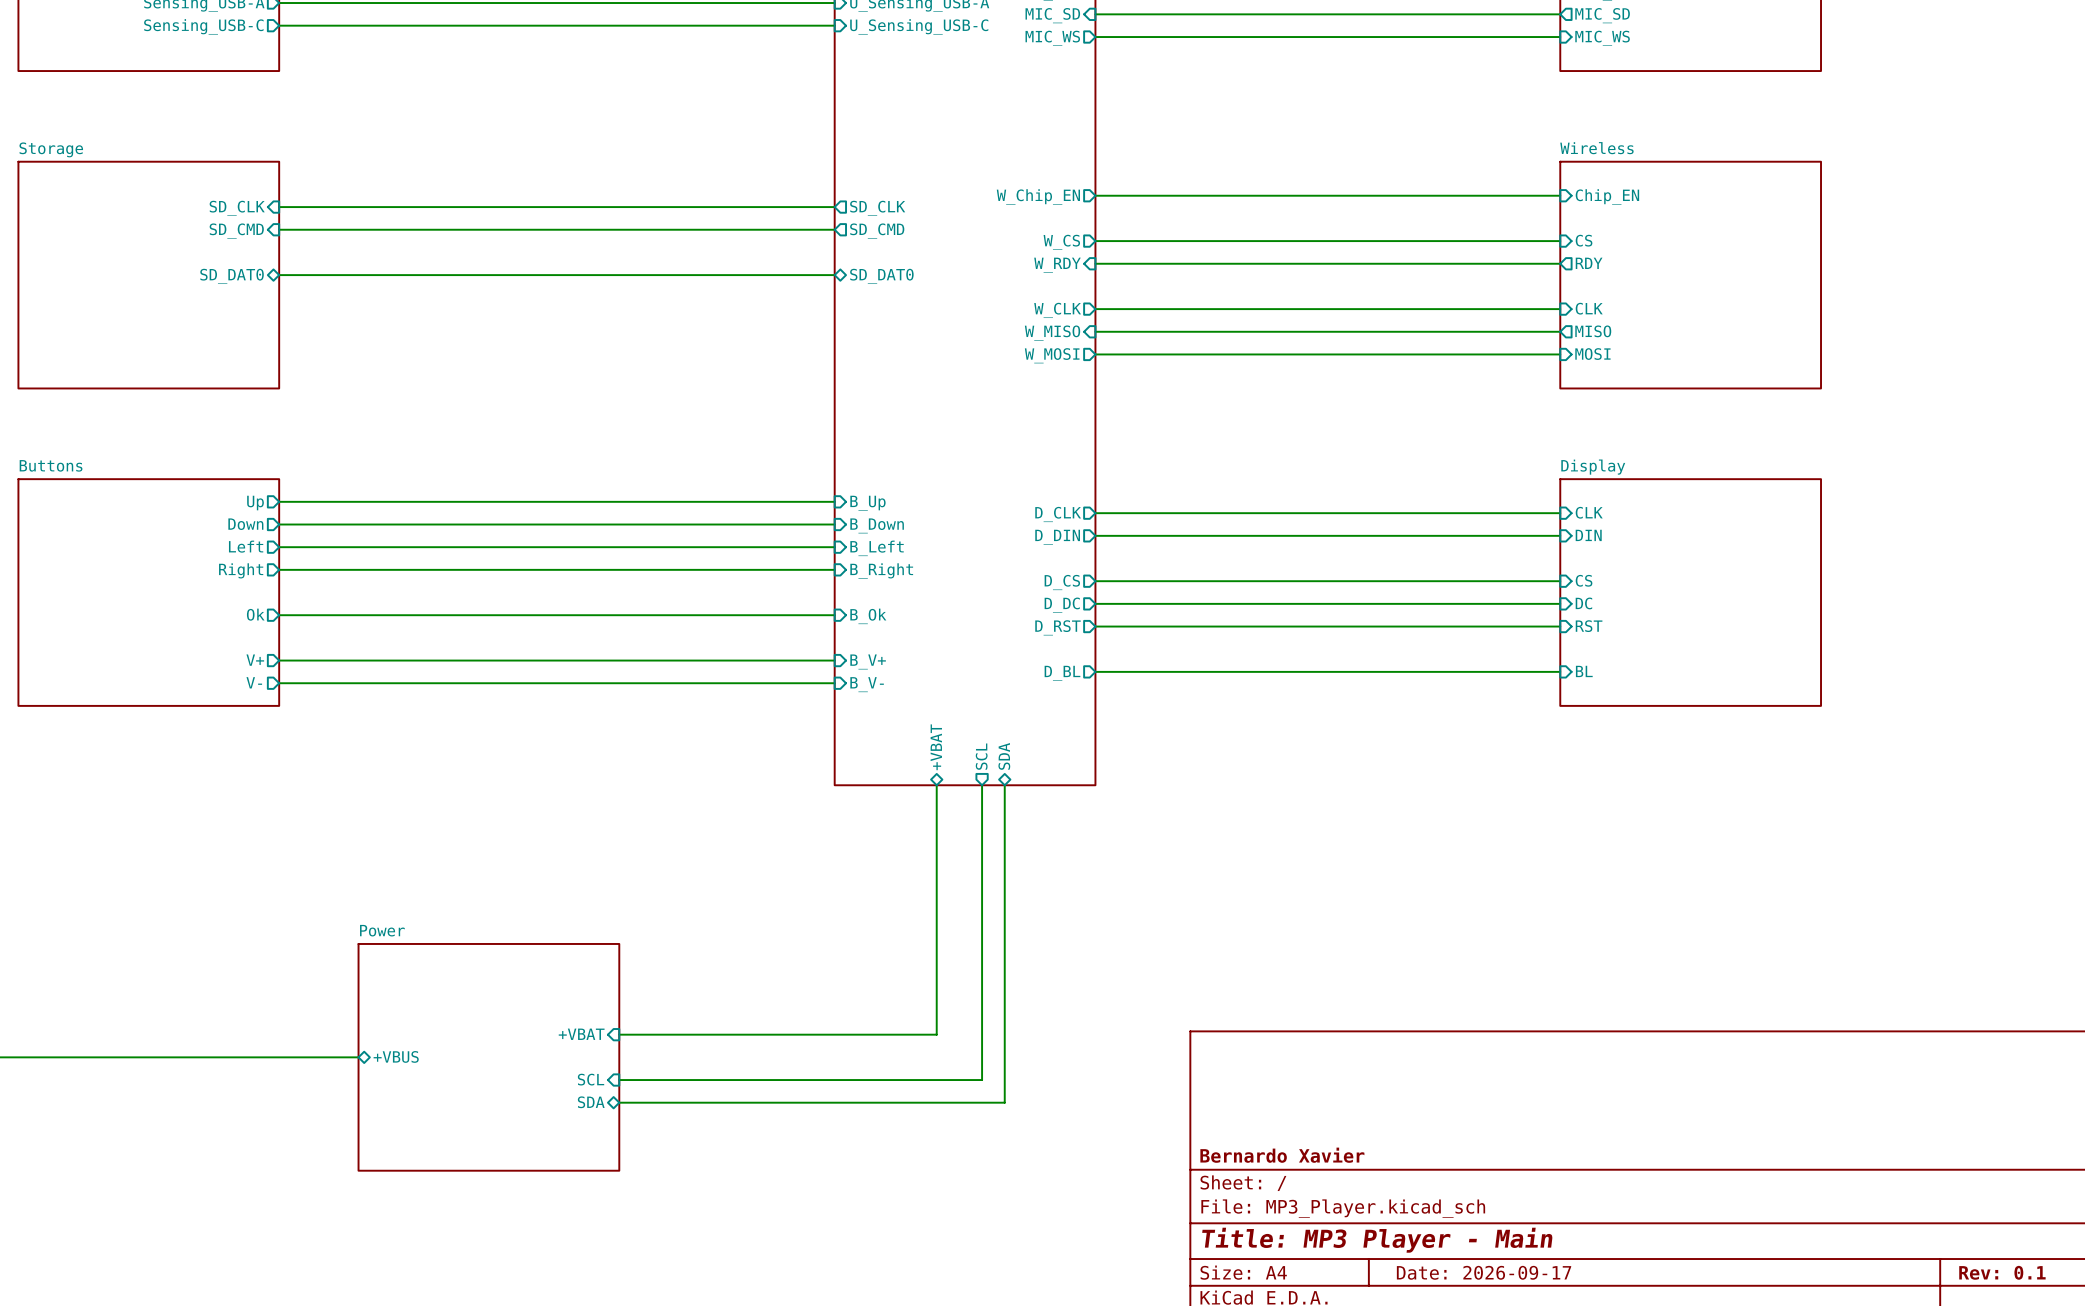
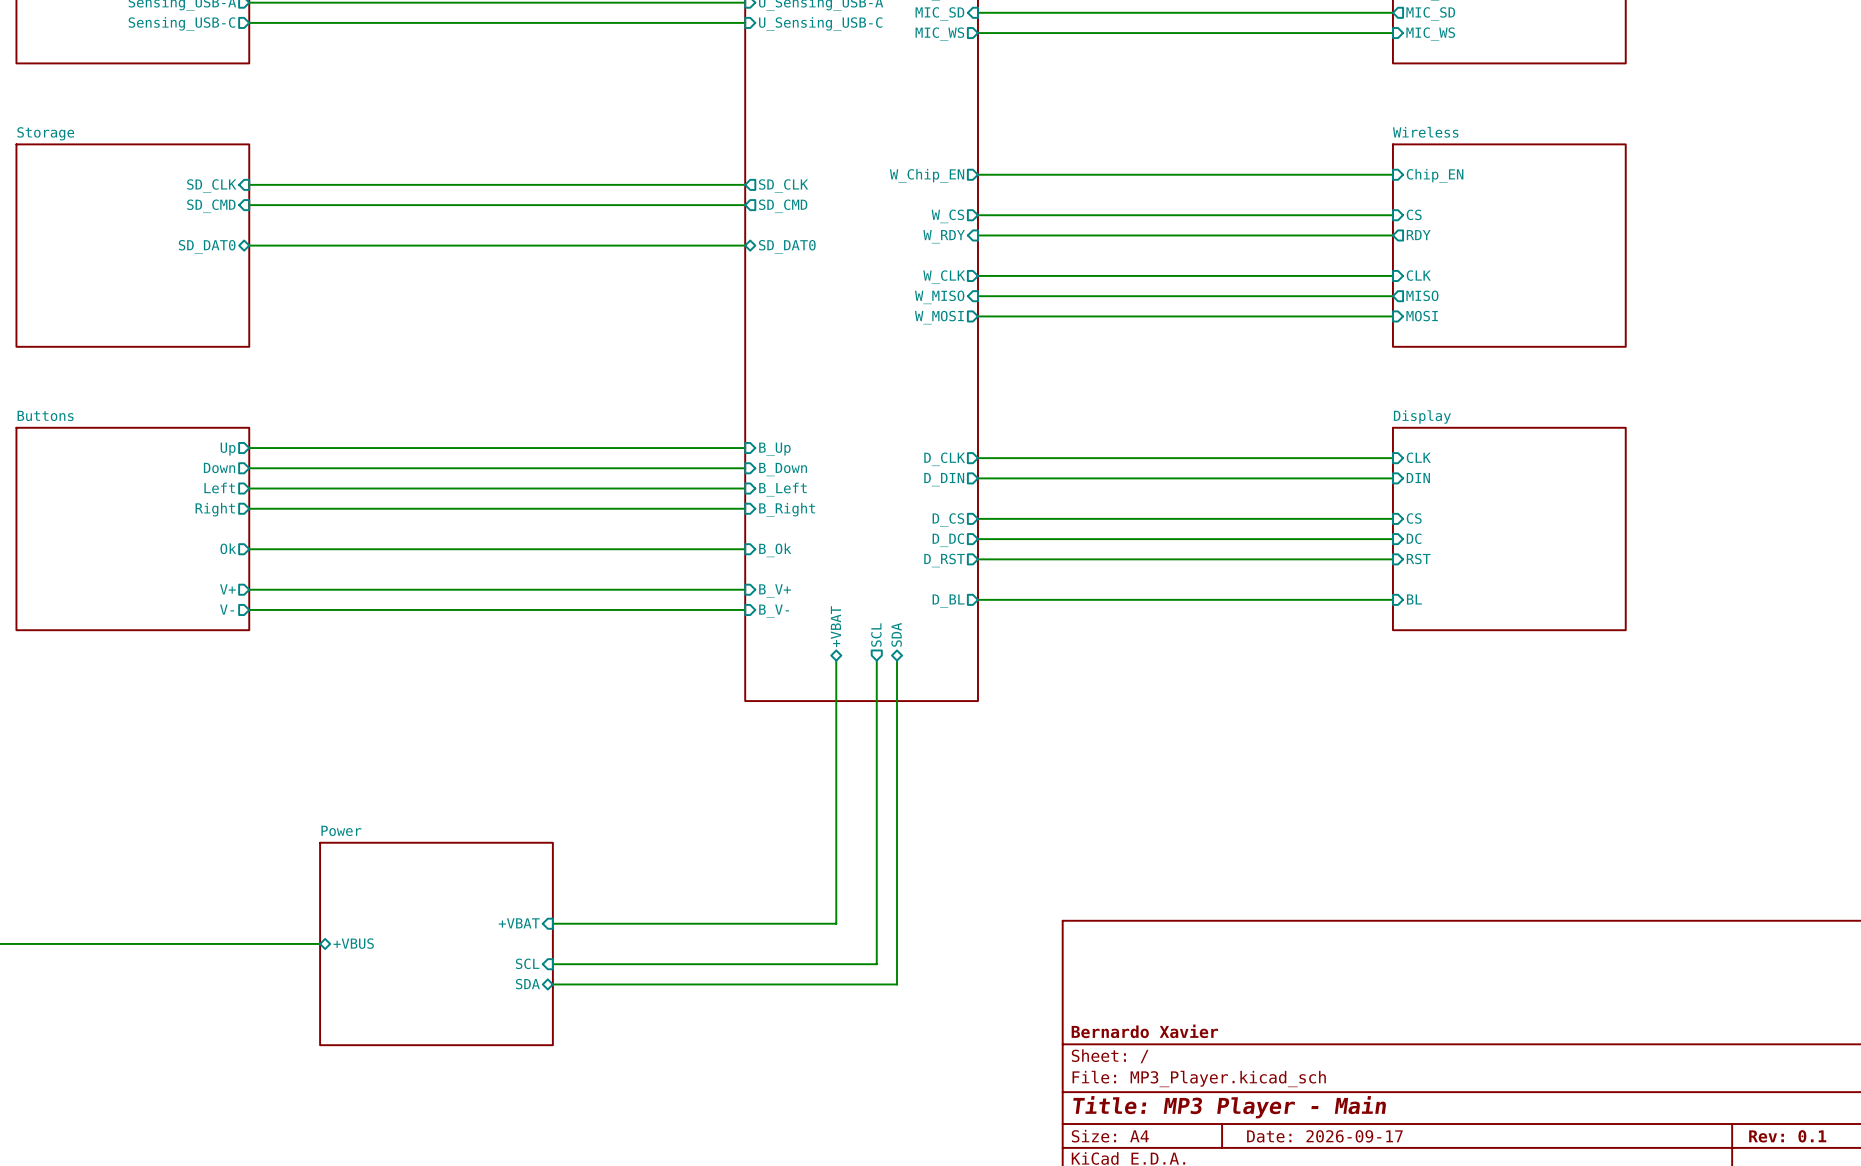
wire: none -> (836, 660) (836, 701)
wire: none -> (876, 660) (876, 701)
wire: none -> (897, 660) (897, 701)
sheet pin position: +VBAT (936, 747) -> +VBAT (835, 626)
sheet pin position: SCL (981, 756) -> SCL (876, 635)
sheet pin position: SDA (1004, 756) -> SDA (896, 634)

